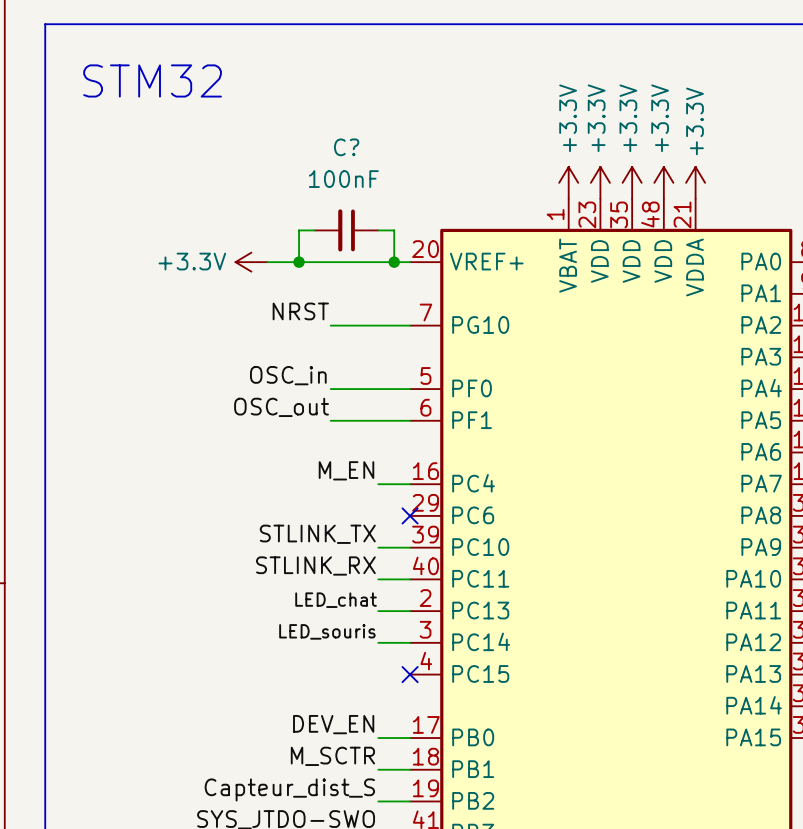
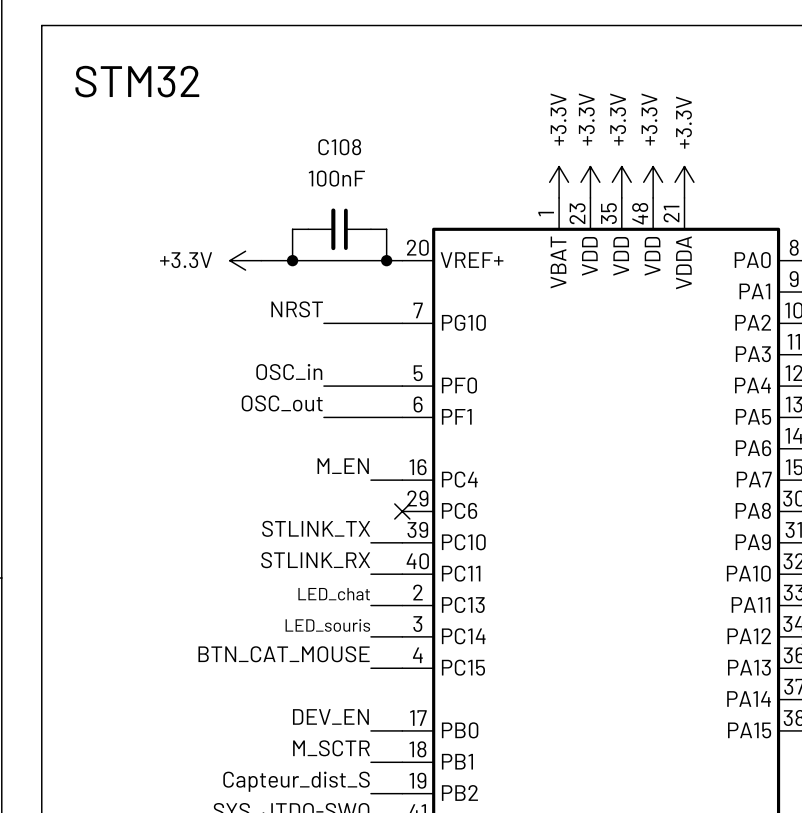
C? name: C? (346, 147) -> C108 (339, 147)
label: none -> BTN_CAT_MOUSE (284, 654)
wire: none -> (370, 668) (402, 668)
no-connect mark: (410, 674) -> none

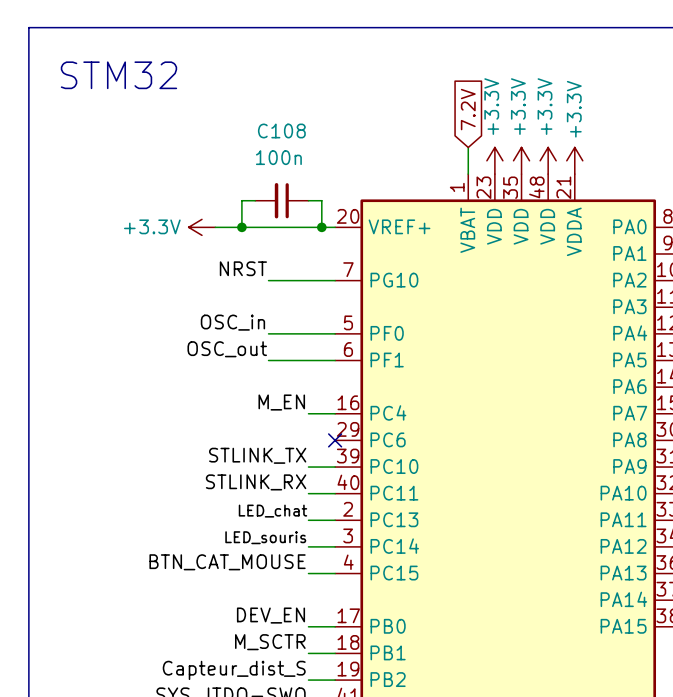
global label: none -> 7.2V (468, 109)
C108 value: 100nF (336, 178) -> 100n (278, 157)
power symbol: +3.3V (559, 182) -> none

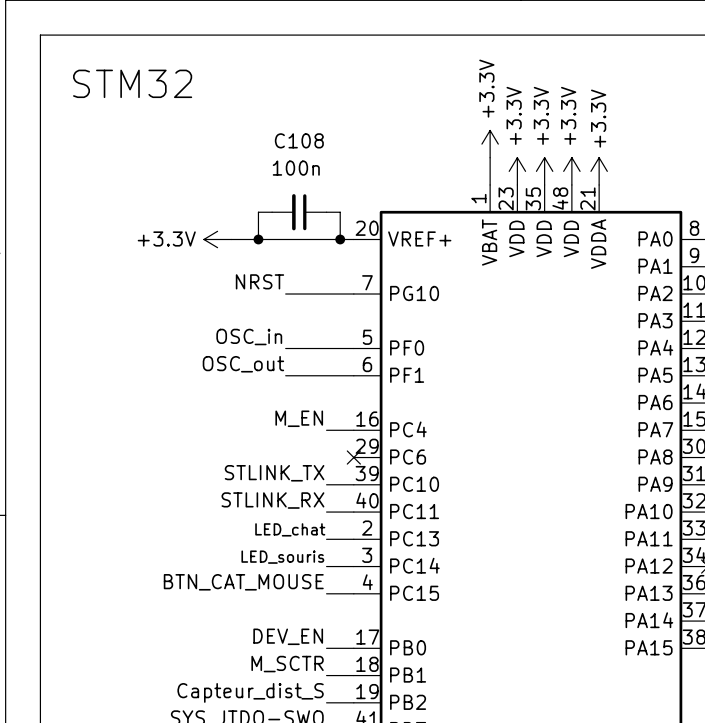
global label: 7.2V (468, 109) -> none
power symbol: none -> +3.3V (490, 144)

